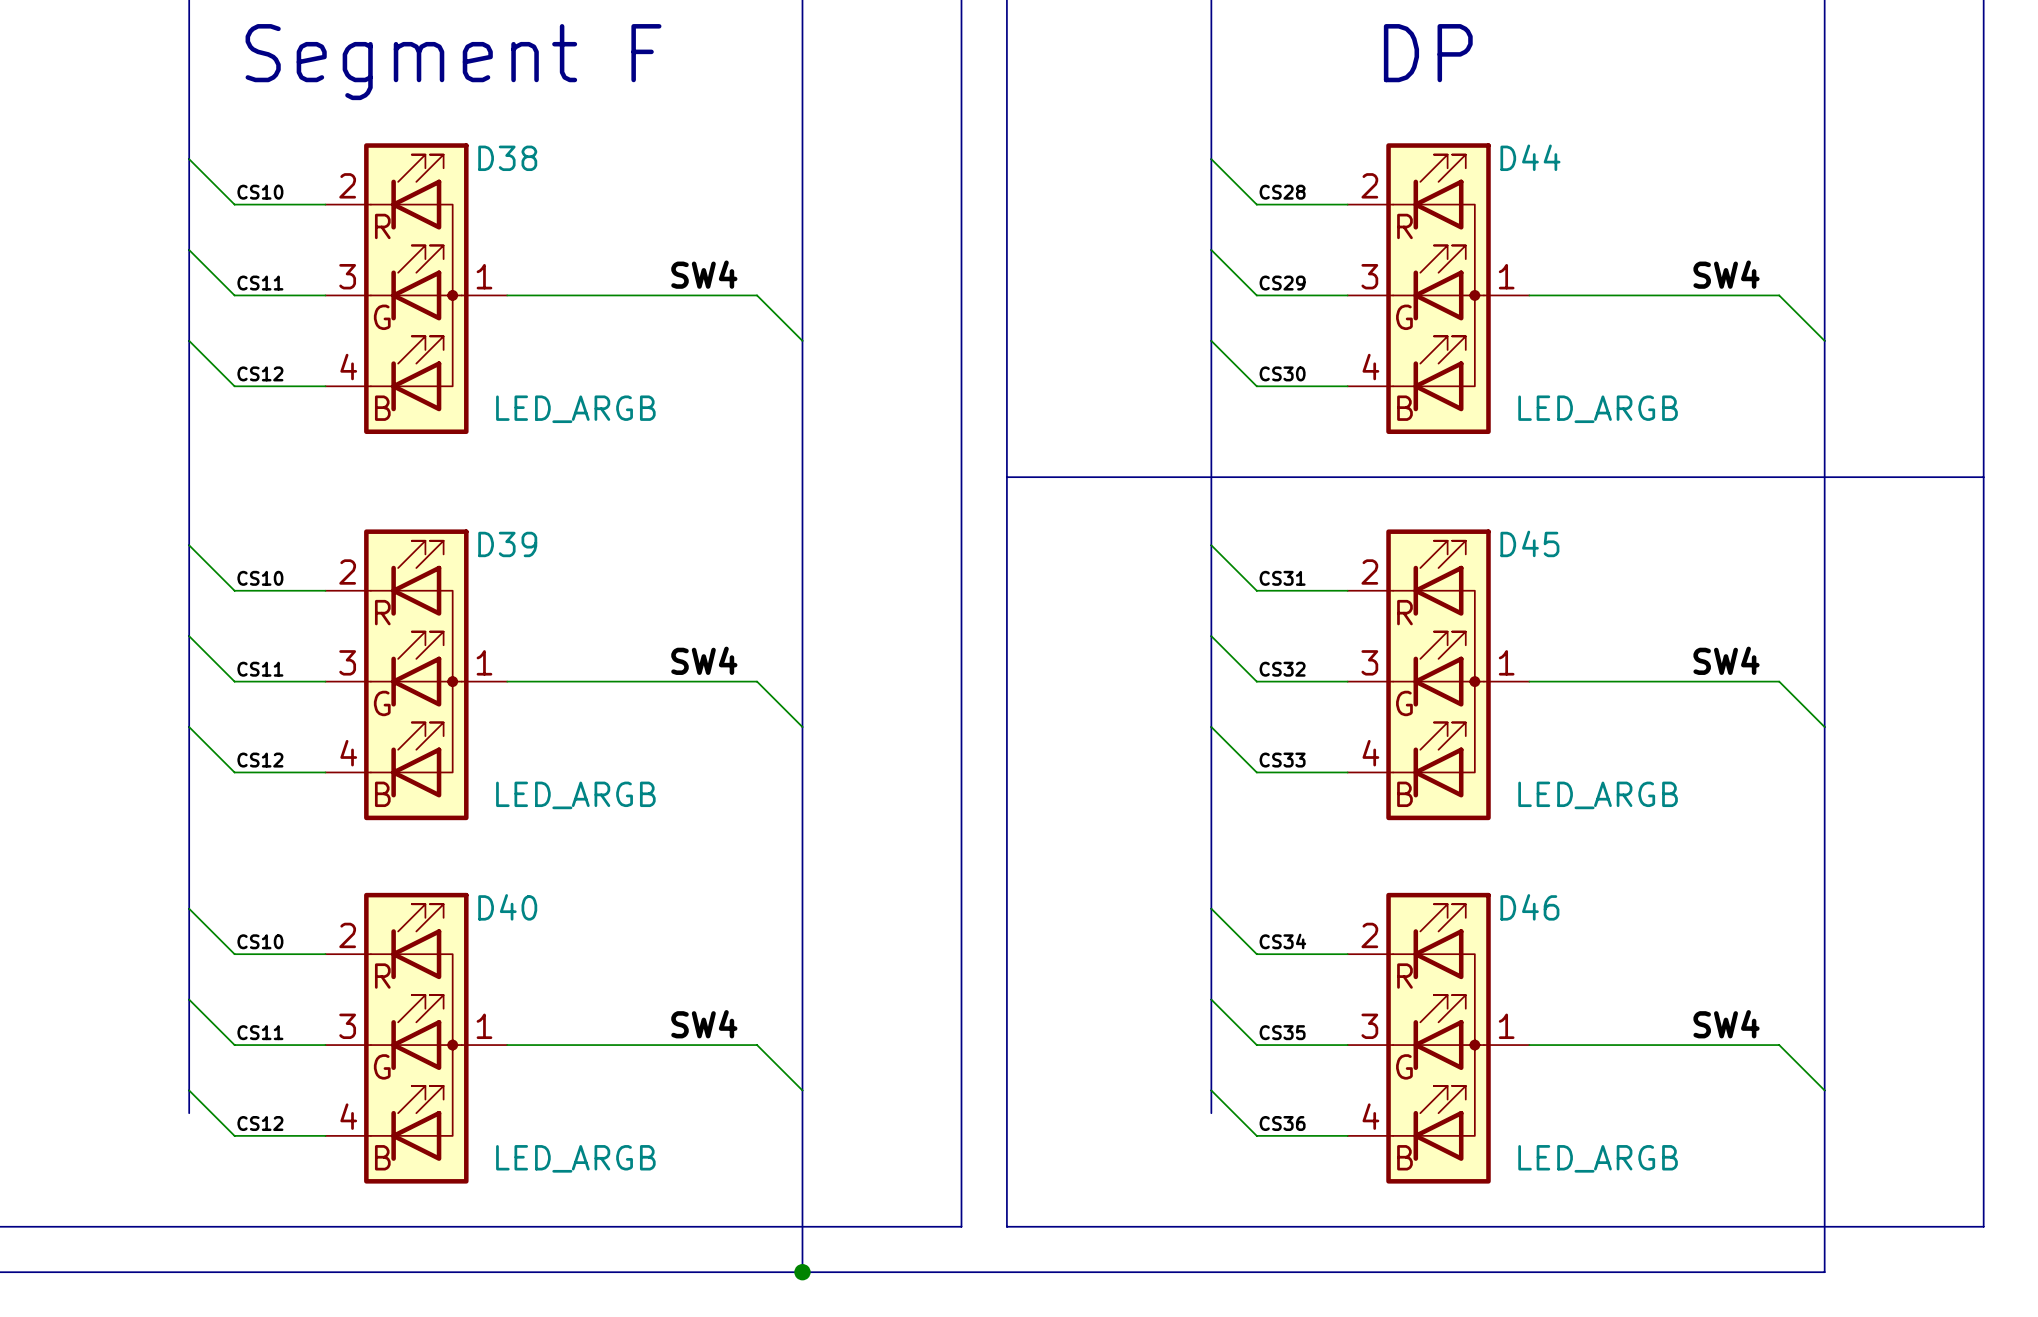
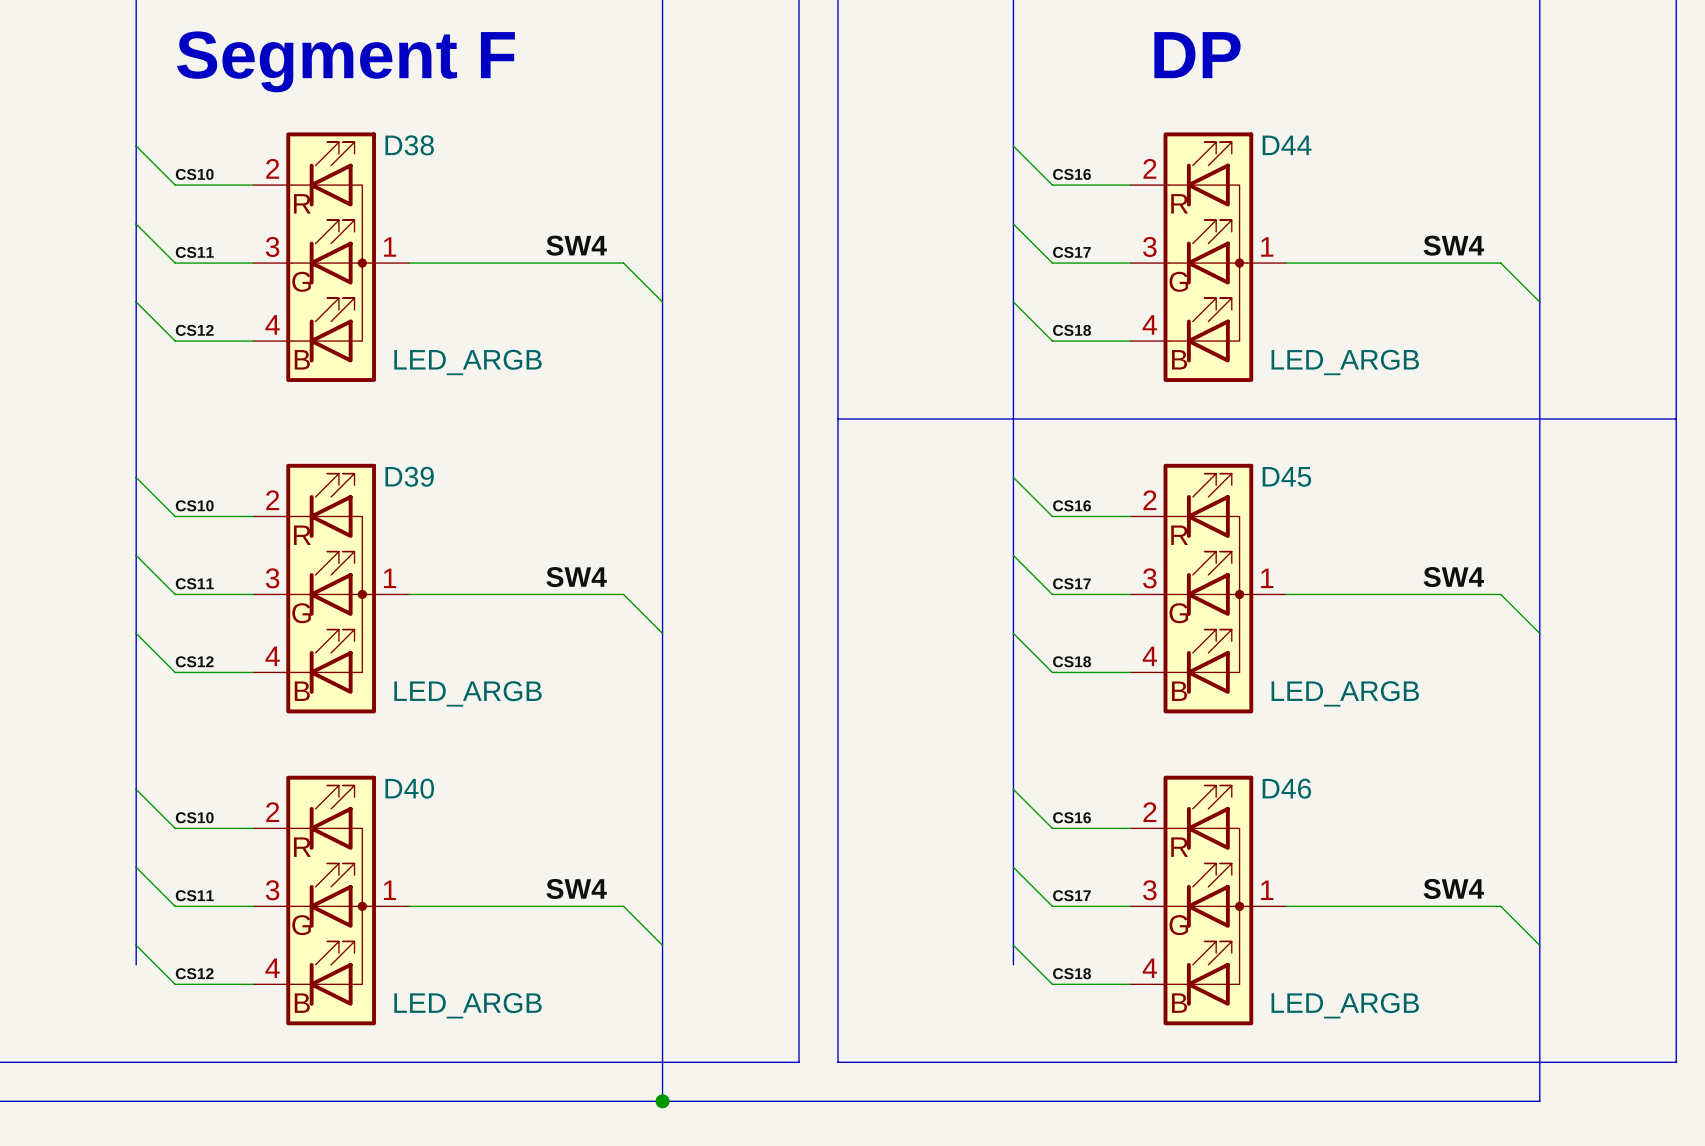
label: CS28 (1282, 192) -> CS16 (1072, 174)
label: CS29 (1282, 283) -> CS17 (1071, 252)
label: CS30 (1282, 373) -> CS18 (1072, 330)
label: CS31 (1282, 578) -> CS16 (1072, 505)
label: CS32 (1282, 669) -> CS17 (1071, 583)
label: CS33 (1282, 760) -> CS18 (1072, 661)
label: CS34 (1282, 941) -> CS16 (1072, 817)
label: CS35 (1282, 1032) -> CS17 (1071, 895)
label: CS36 (1282, 1123) -> CS18 (1072, 973)

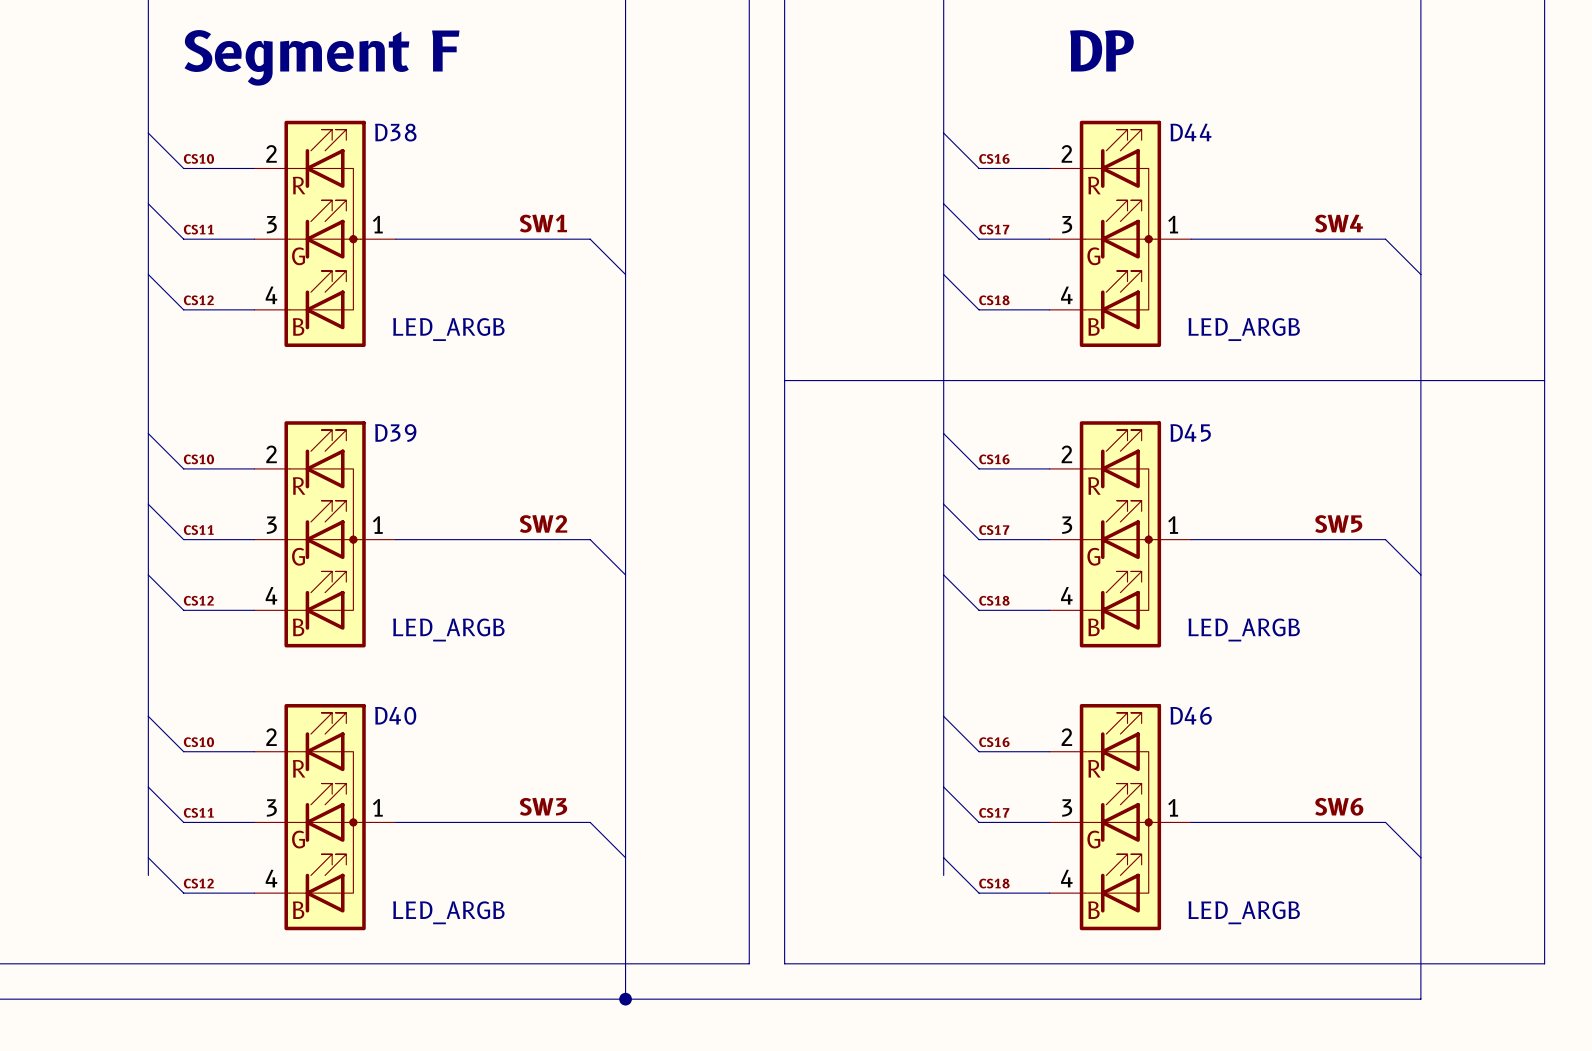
label: SW4 (576, 245) -> SW1 (543, 223)
label: SW4 (576, 577) -> SW2 (543, 523)
label: SW4 (1453, 577) -> SW5 (1338, 523)
label: SW4 (576, 888) -> SW3 (543, 806)
label: SW4 (1453, 888) -> SW6 (1339, 806)

